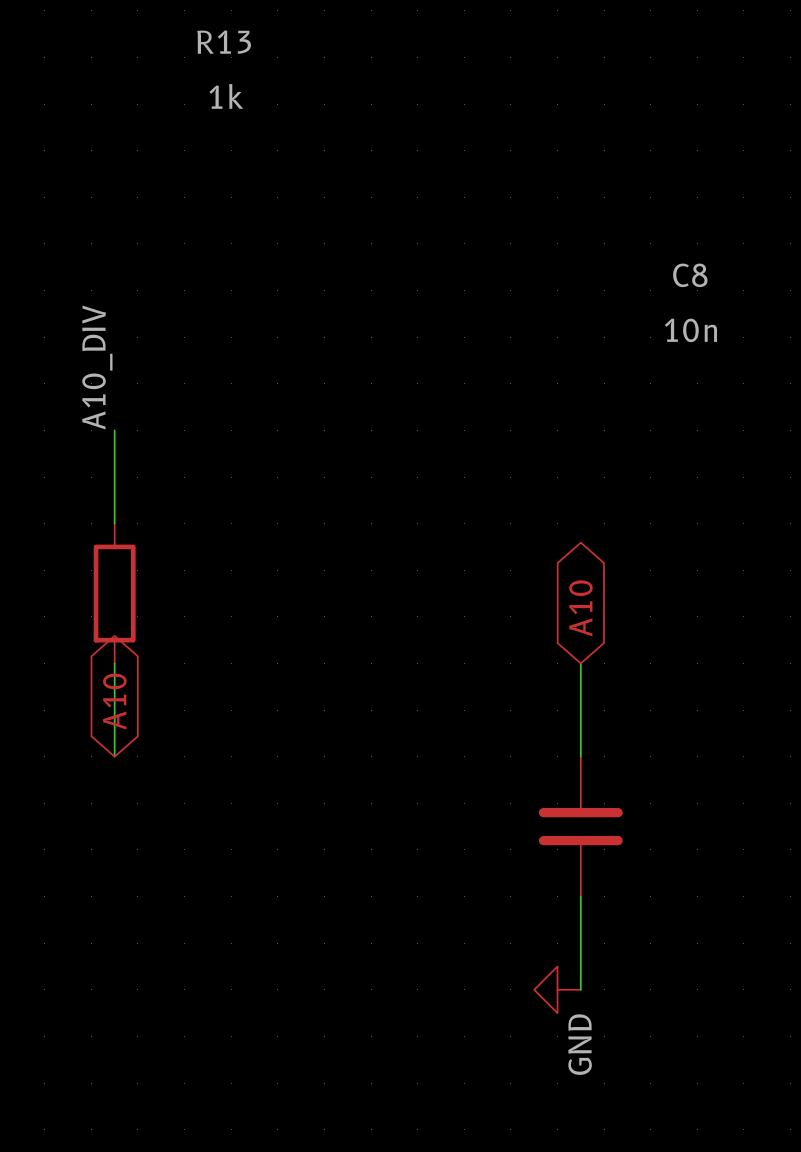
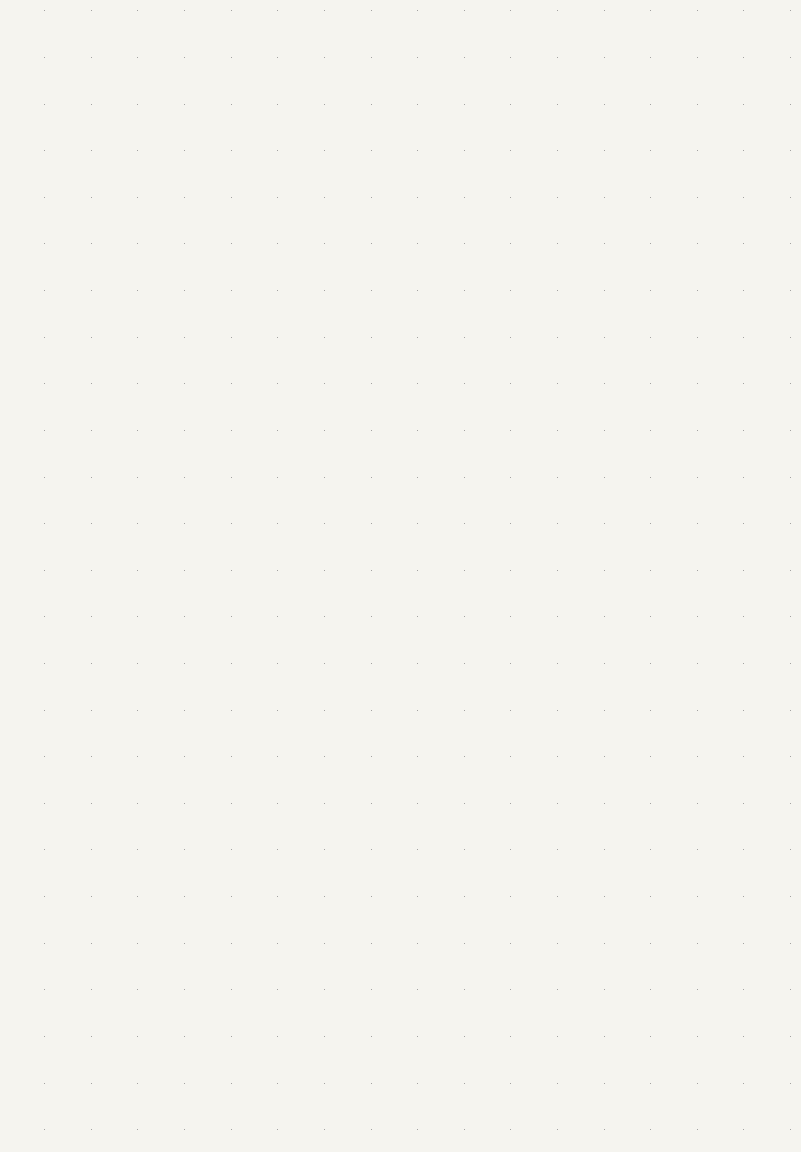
label: A10_DIV (97, 367) -> none
wire: (114, 430) (114, 523) -> none
R13: 1k (114, 593) -> none
global label: A10 (580, 608) -> none
wire: (114, 663) (114, 756) -> none
wire: (580, 663) (580, 756) -> none
global label: A10 (114, 701) -> none
C8: 10n (580, 826) -> none
wire: (580, 896) (580, 989) -> none
power symbol: GND (557, 989) -> none

